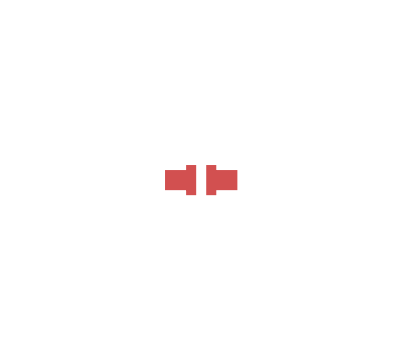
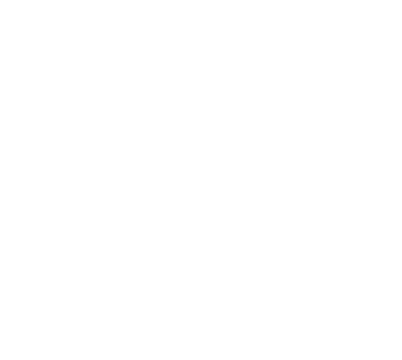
part: (201, 180) -> none
part: (201, 180) -> none

